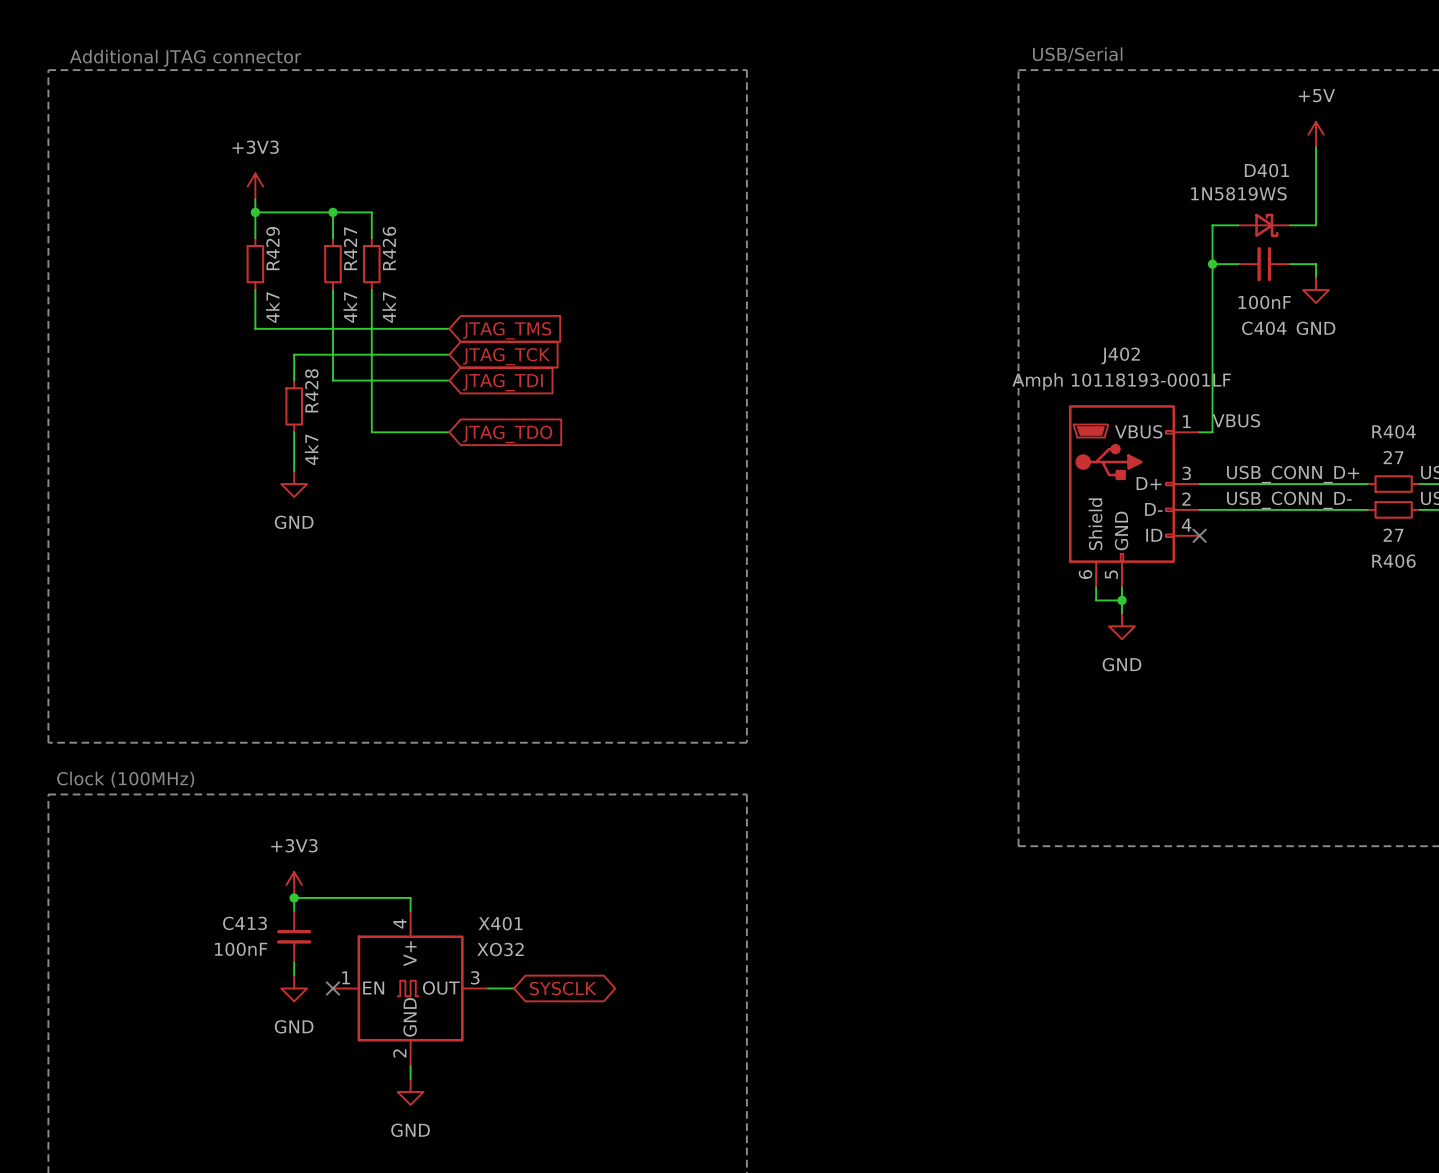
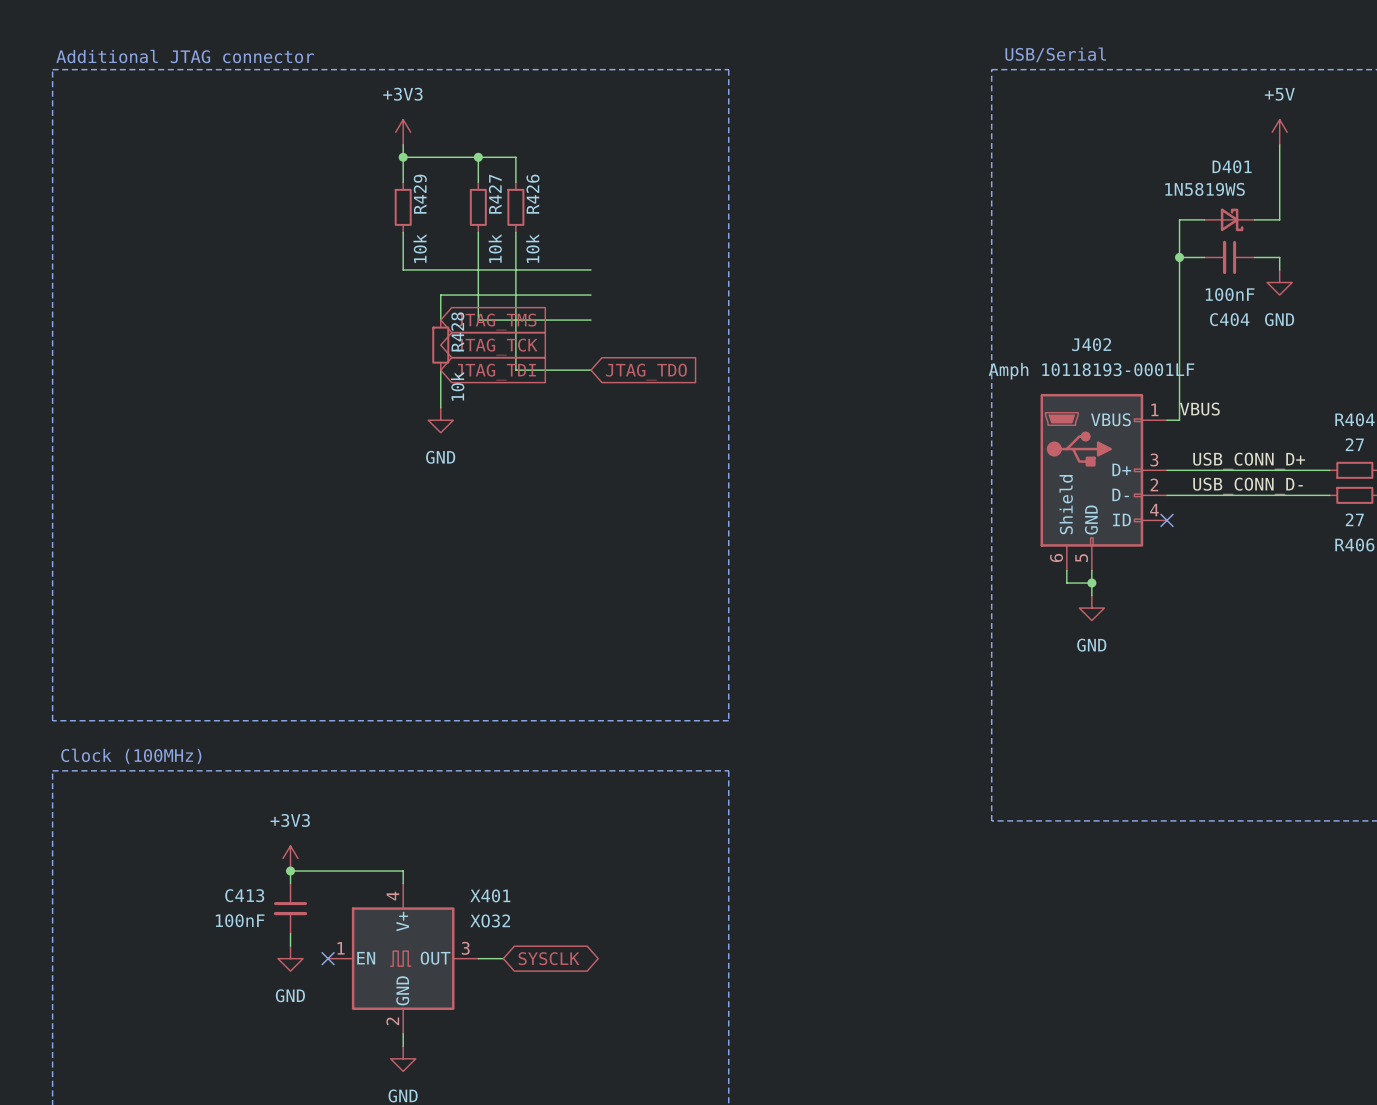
junction: none -> (403, 157)
junction: none -> (478, 157)
power symbol position: +3V3 (255, 186) -> +3V3 (403, 132)
wire: (255, 199) (255, 238) -> (403, 144) (403, 182)
wire: (255, 212) (371, 212) (371, 238) -> (403, 157) (515, 157) (515, 182)
junction: (255, 212) -> none
wire: (332, 212) (332, 238) -> (478, 157) (478, 182)
junction: (332, 212) -> none
wire: none -> (403, 232) (403, 269) (591, 269)
wire: none -> (478, 232) (478, 320) (591, 320)
R429 position: (255, 264) -> (403, 207)
R427 position: (332, 264) -> (478, 207)
R426 position: (371, 264) -> (515, 207)
wire: (255, 290) (255, 328) (449, 328) -> (591, 295) (440, 295) (440, 320)
wire: (332, 290) (332, 380) (449, 380) -> (440, 407) (440, 370)
wire: (371, 290) (371, 432) (449, 432) -> (515, 232) (515, 370) (591, 370)
R429 value: 4k7 (272, 307) -> 10k (420, 248)
R427 value: 4k7 (350, 307) -> 10k (495, 248)
R426 value: 4k7 (389, 307) -> 10k (532, 248)
wire: (449, 354) (294, 354) (294, 380) -> none
R428 position: (294, 406) -> (440, 345)
wire: (294, 432) (294, 471) -> none
global label position: JTAG_TDO (507, 434) -> JTAG_TDO (646, 372)
R428 value: 4k7 (311, 449) -> 10k (457, 386)
power symbol position: GND (294, 484) -> GND (440, 420)

